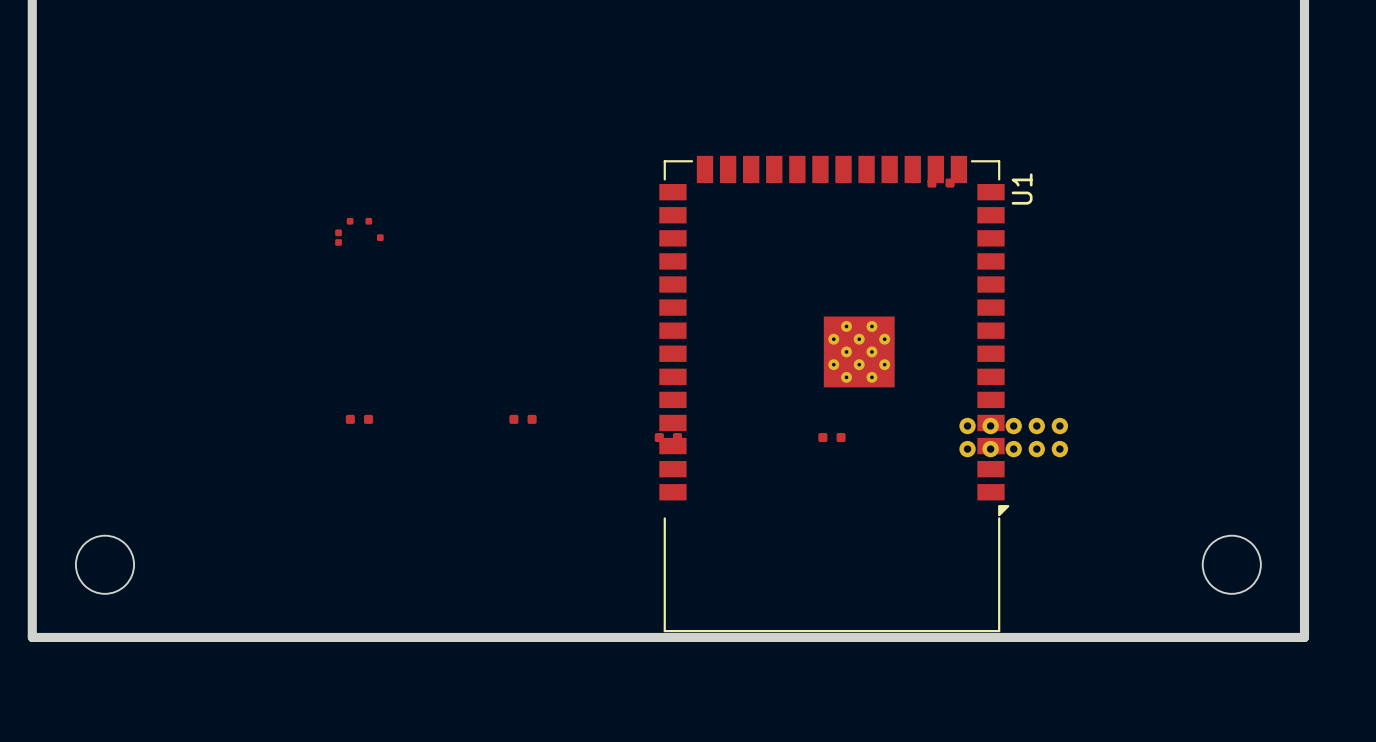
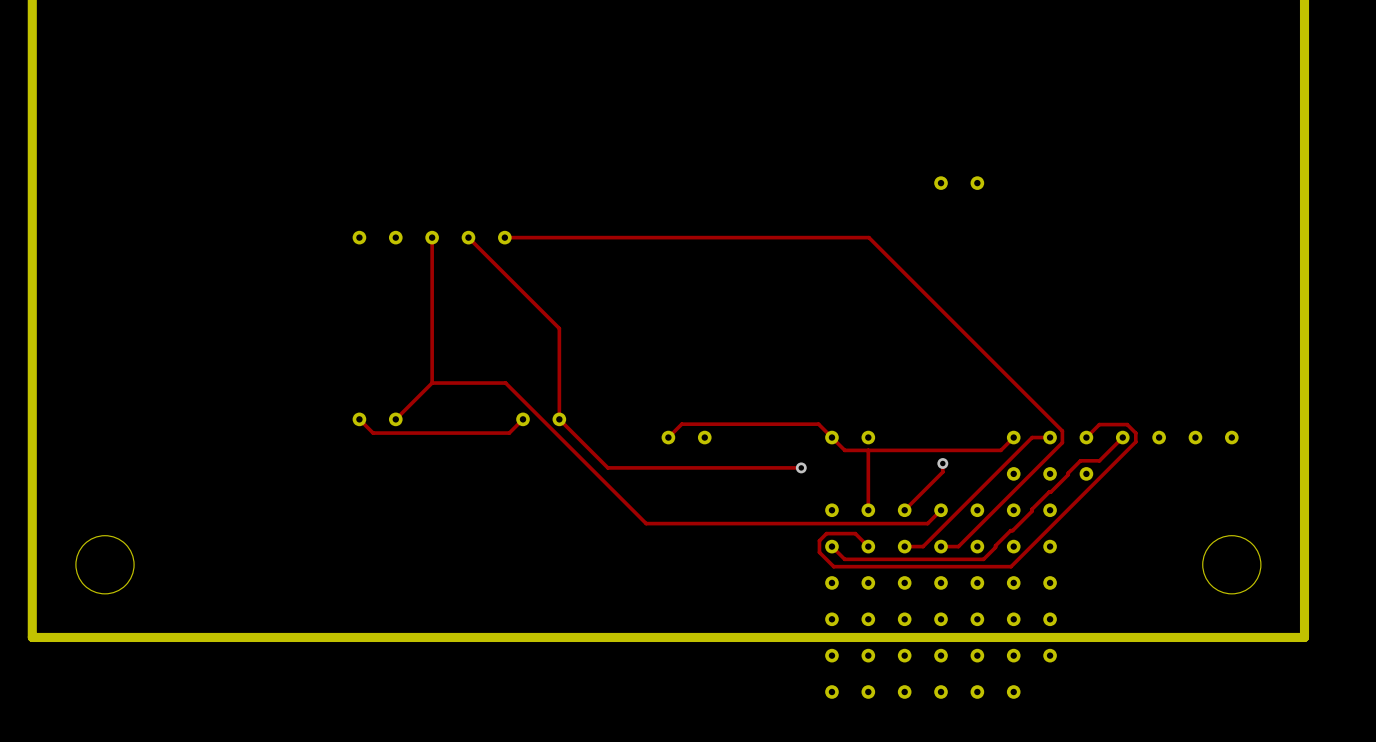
part footprint: [927, 178, 955, 188] -> [934, 176, 985, 190]
part: (359, 231) -> none
track: none -> (432, 237) (432, 383)
part: none -> (432, 237)
track: none -> (468, 237) (559, 328) (559, 419) (607, 467) (801, 467)
track: none -> (504, 237) (868, 237) (1062, 431) (1062, 442) (958, 546) (941, 546)
track: none -> (432, 383) (505, 383) (646, 523) (927, 523) (941, 510)
track: none -> (432, 383) (395, 419)
U1: (834, 394) -> none
part footprint: [345, 414, 374, 424] -> [352, 412, 403, 427]
part footprint: [509, 414, 537, 424] -> [516, 412, 567, 427]
track: none -> (359, 419) (373, 433) (509, 433) (523, 419)
part footprint: [654, 433, 683, 443] -> [661, 430, 712, 445]
part footprint: [818, 433, 846, 443] -> [825, 430, 876, 445]
track: none -> (668, 437) (681, 424) (818, 424) (844, 450) (1000, 450) (1013, 437)
part: (1013, 437) -> none
track: none -> (1050, 437) (1032, 437) (923, 546) (904, 546)
track: none -> (1086, 437) (1099, 424) (1127, 424) (1135, 433) (1135, 441) (1011, 566) (833, 566) (819, 552) (819, 540) (826, 533) (855, 533) (868, 546)
track: none -> (1122, 437) (1099, 460) (1080, 460) (983, 559) (844, 559) (831, 546)
track: none -> (868, 450) (868, 510)
part: none -> (1122, 455)
track: none -> (942, 463) (942, 472) (904, 510)
via: none -> (942, 463)
via: none -> (801, 467)
part: none -> (941, 601)

